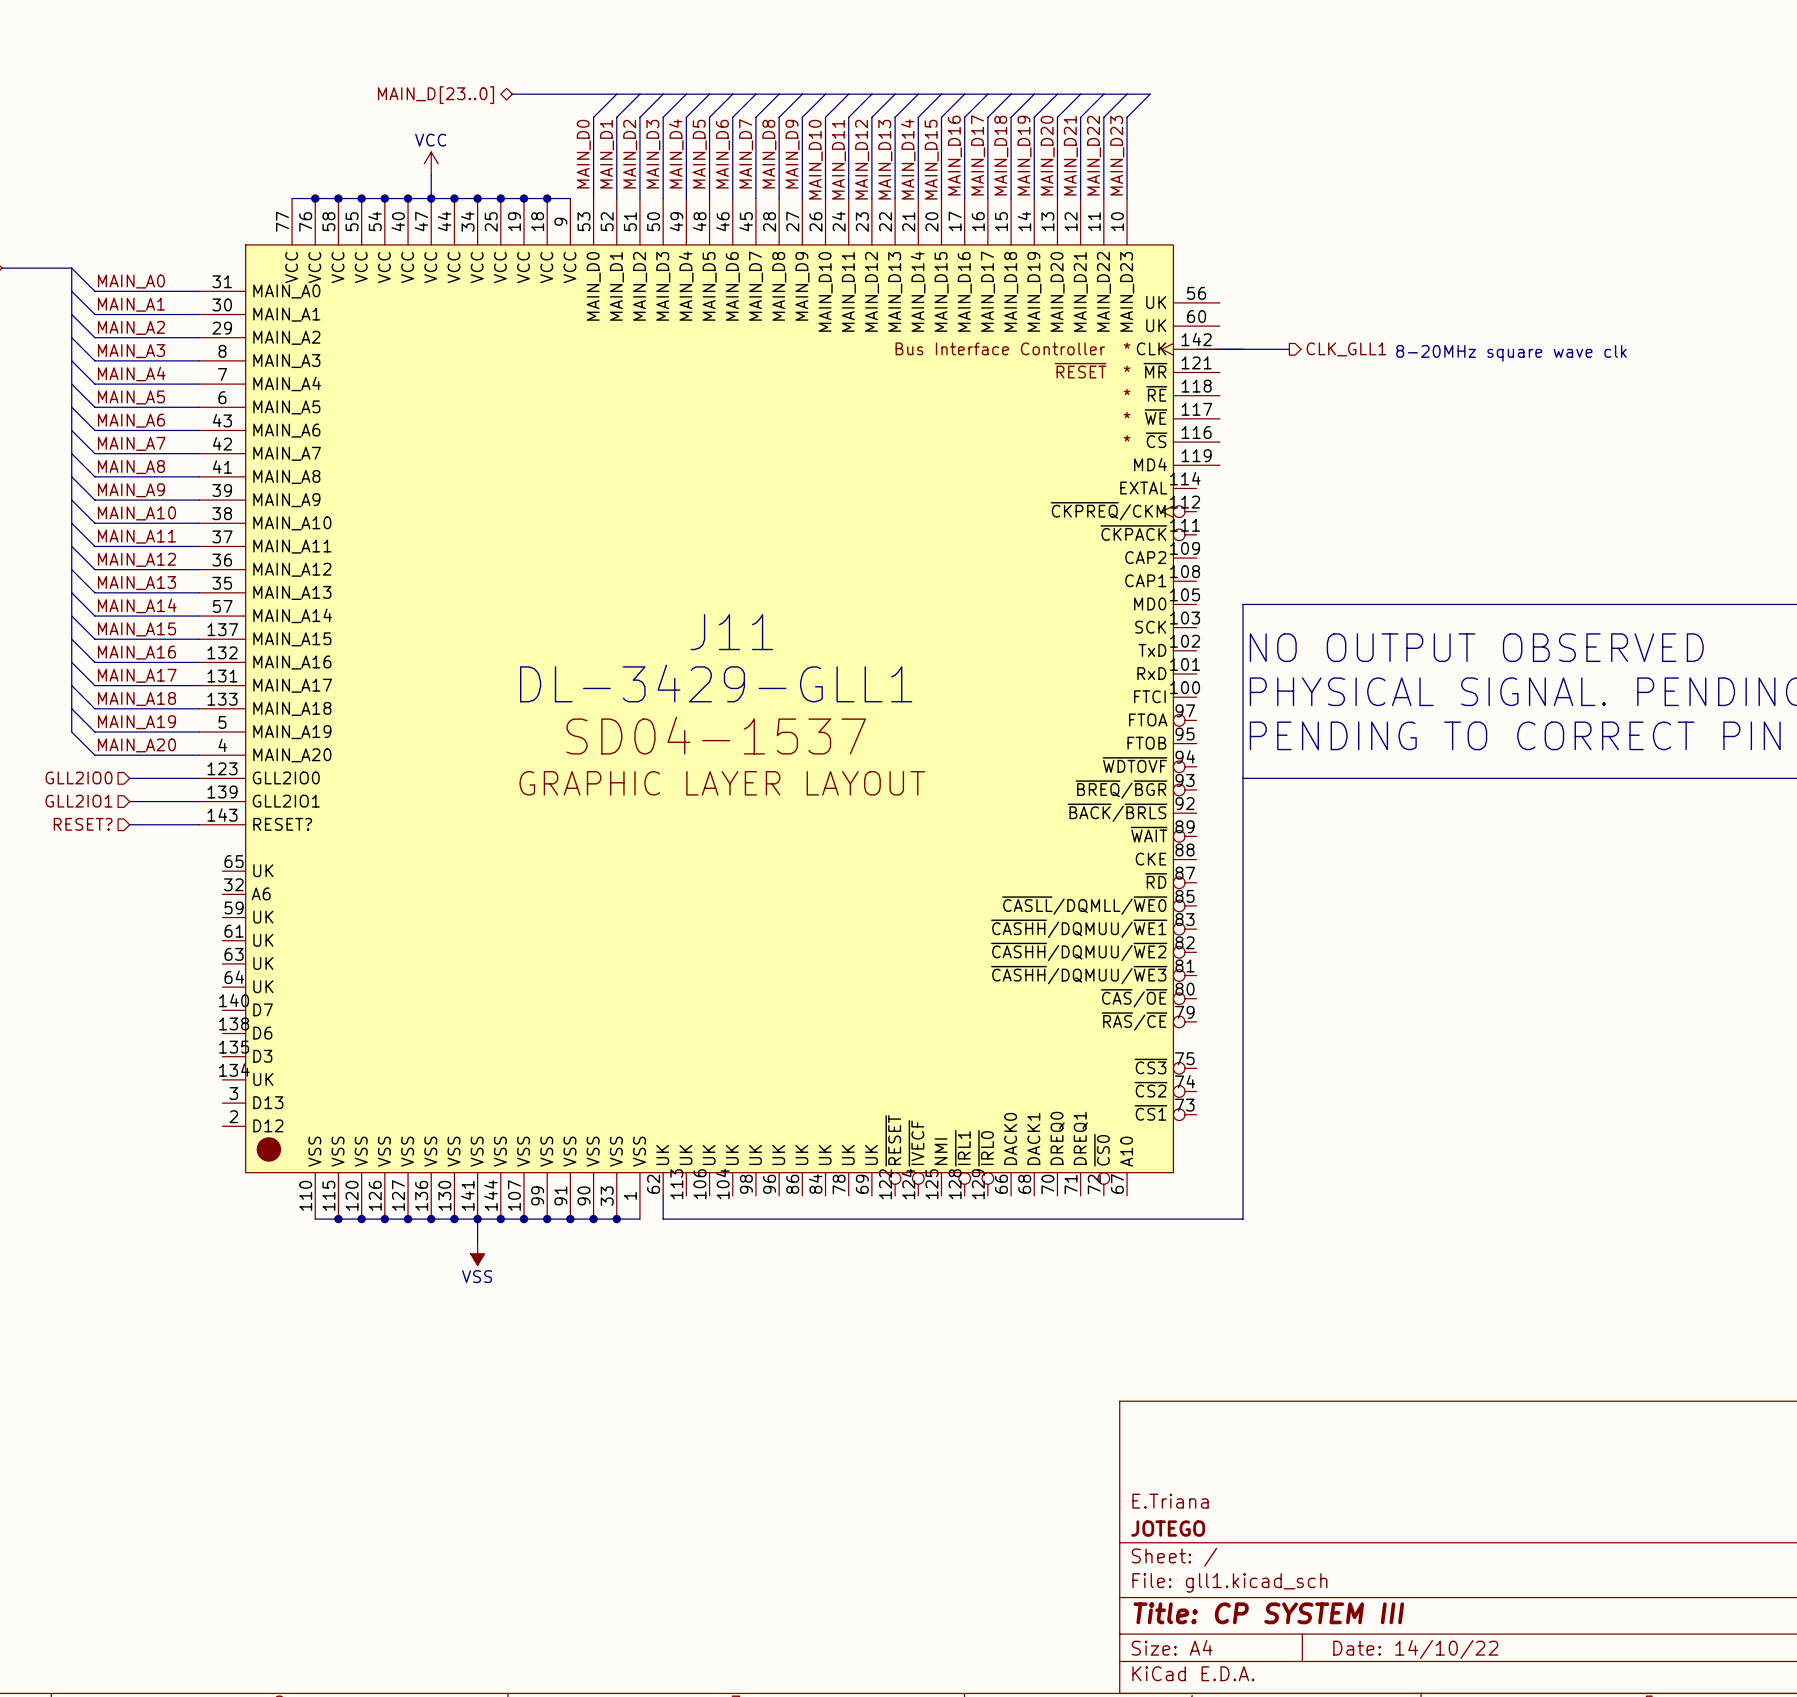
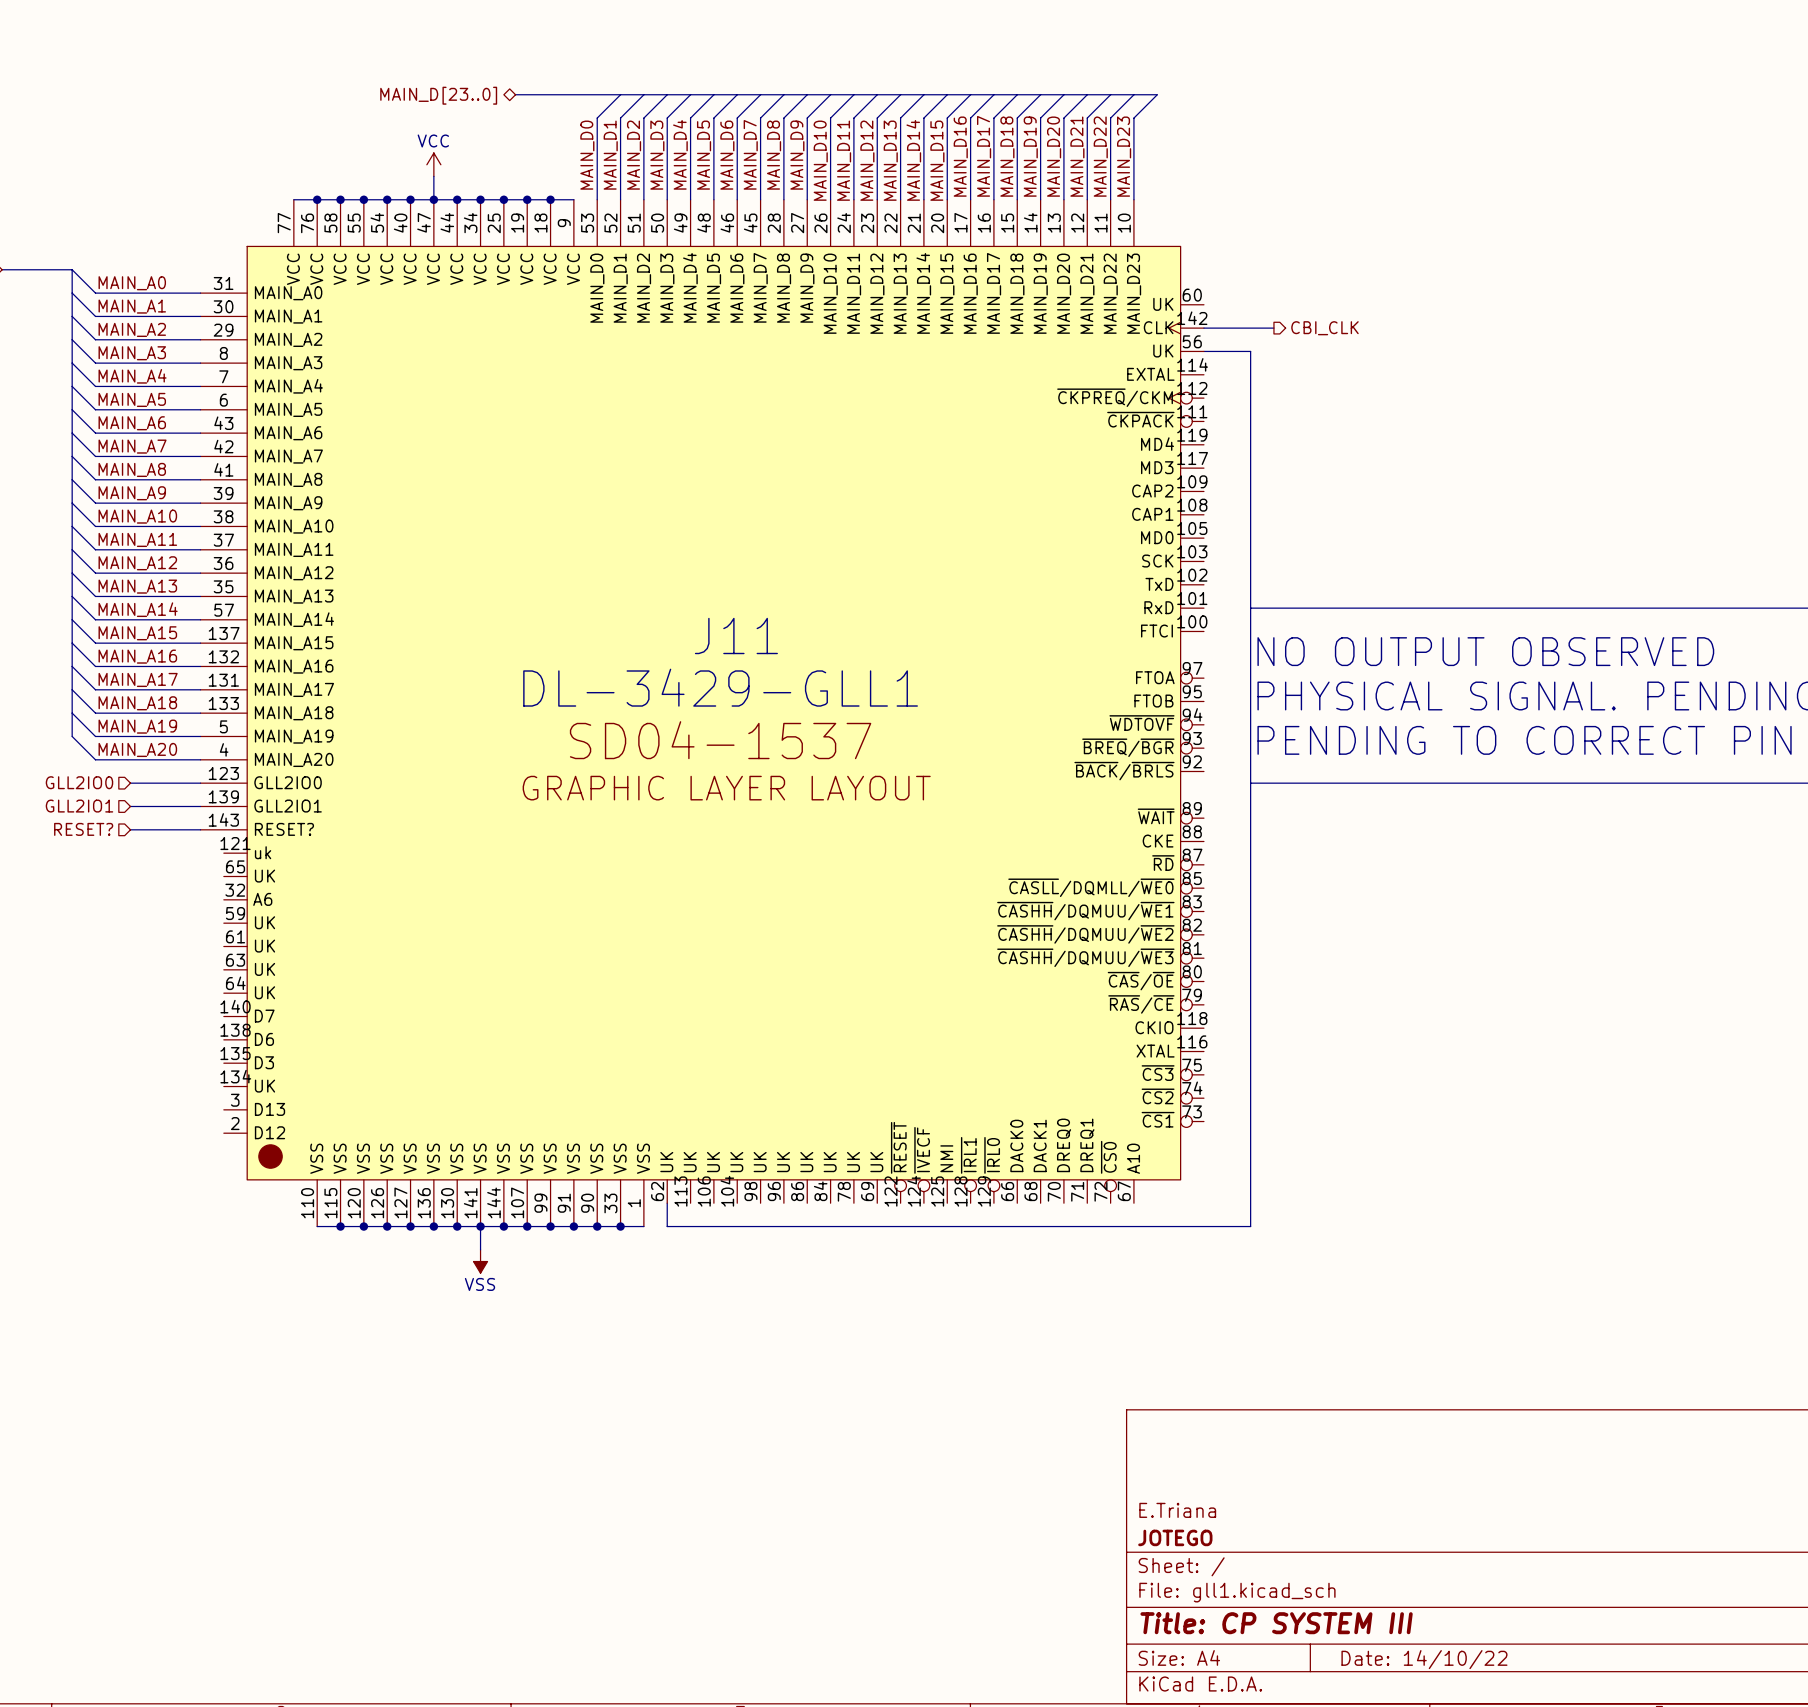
J11 symbol: [199, 198, 1220, 1220] -> [200, 199, 1204, 1227]
hierarchical label: none -> CBI_CLK (1324, 328)
wire: (1219, 349) (1289, 349) -> (1203, 328) (1273, 328)
line: none -> (1250, 351) (1250, 608)
hierarchical label: CLK_GLL1 (1346, 349) -> none
text: 8-20MHz square wave clk (1511, 353) -> none

